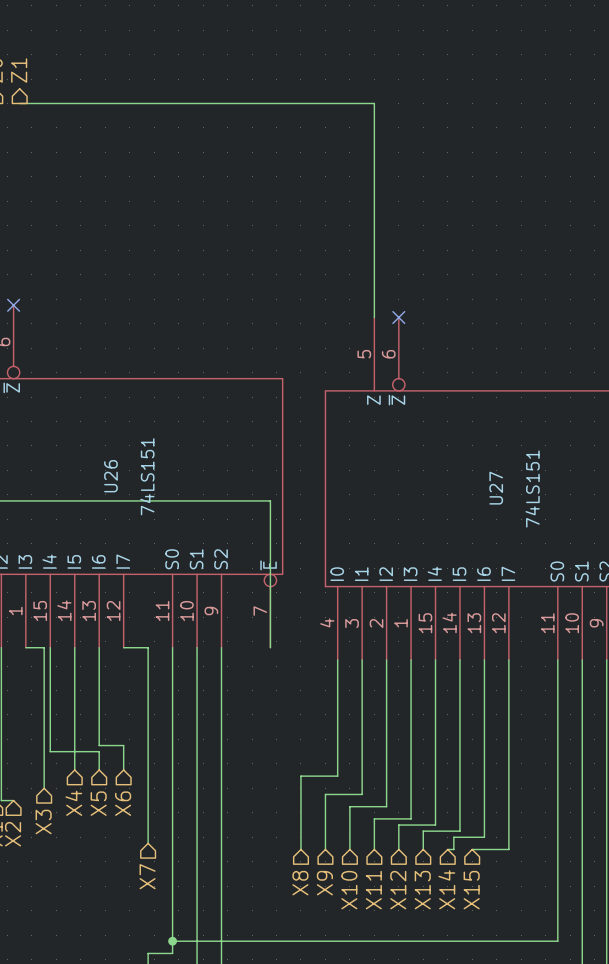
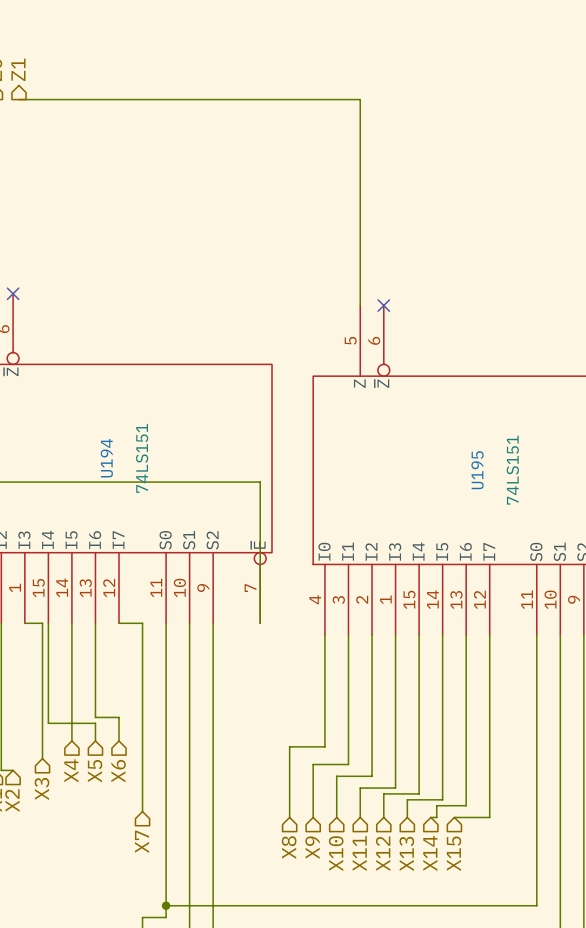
U26 name: U26 (110, 476) -> U194 (106, 458)
U27 name: U27 (496, 488) -> U195 (477, 470)

